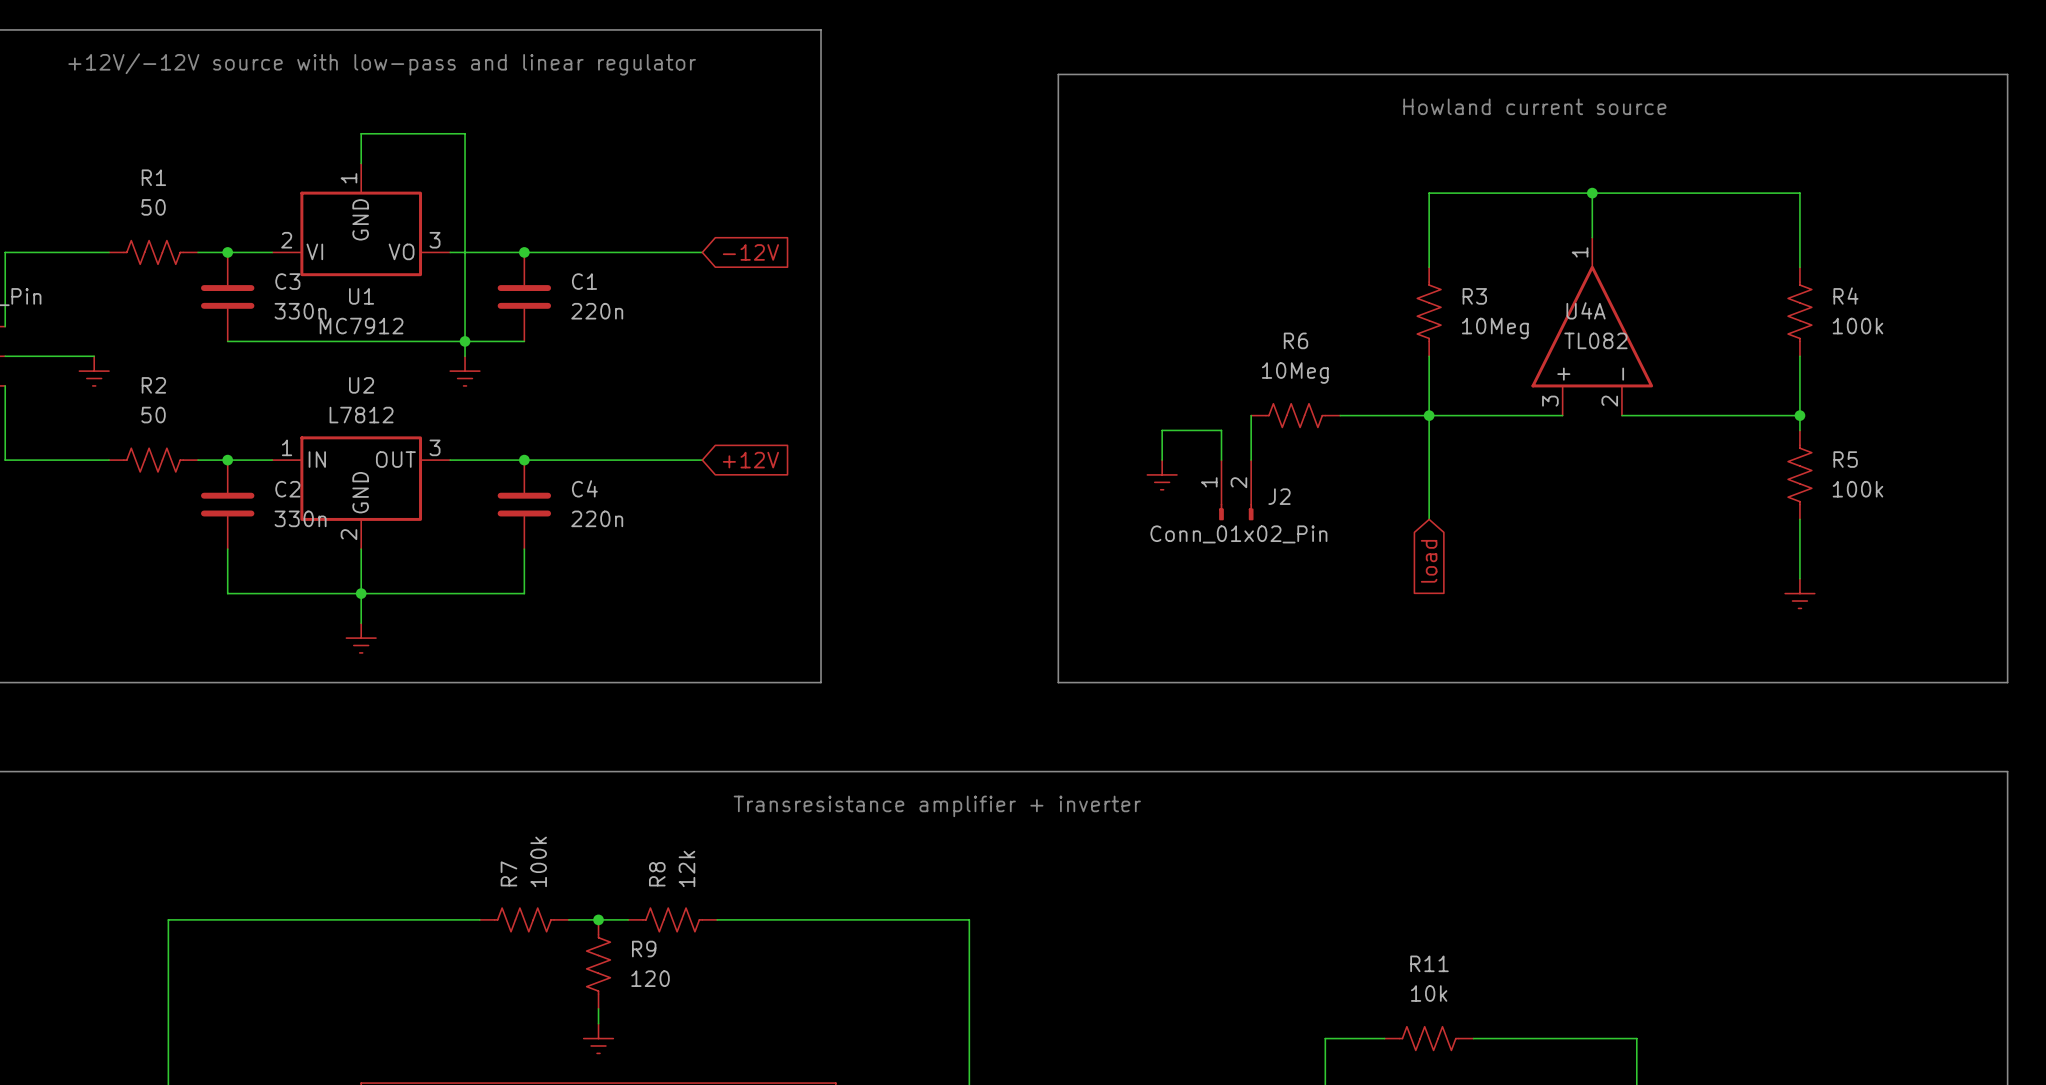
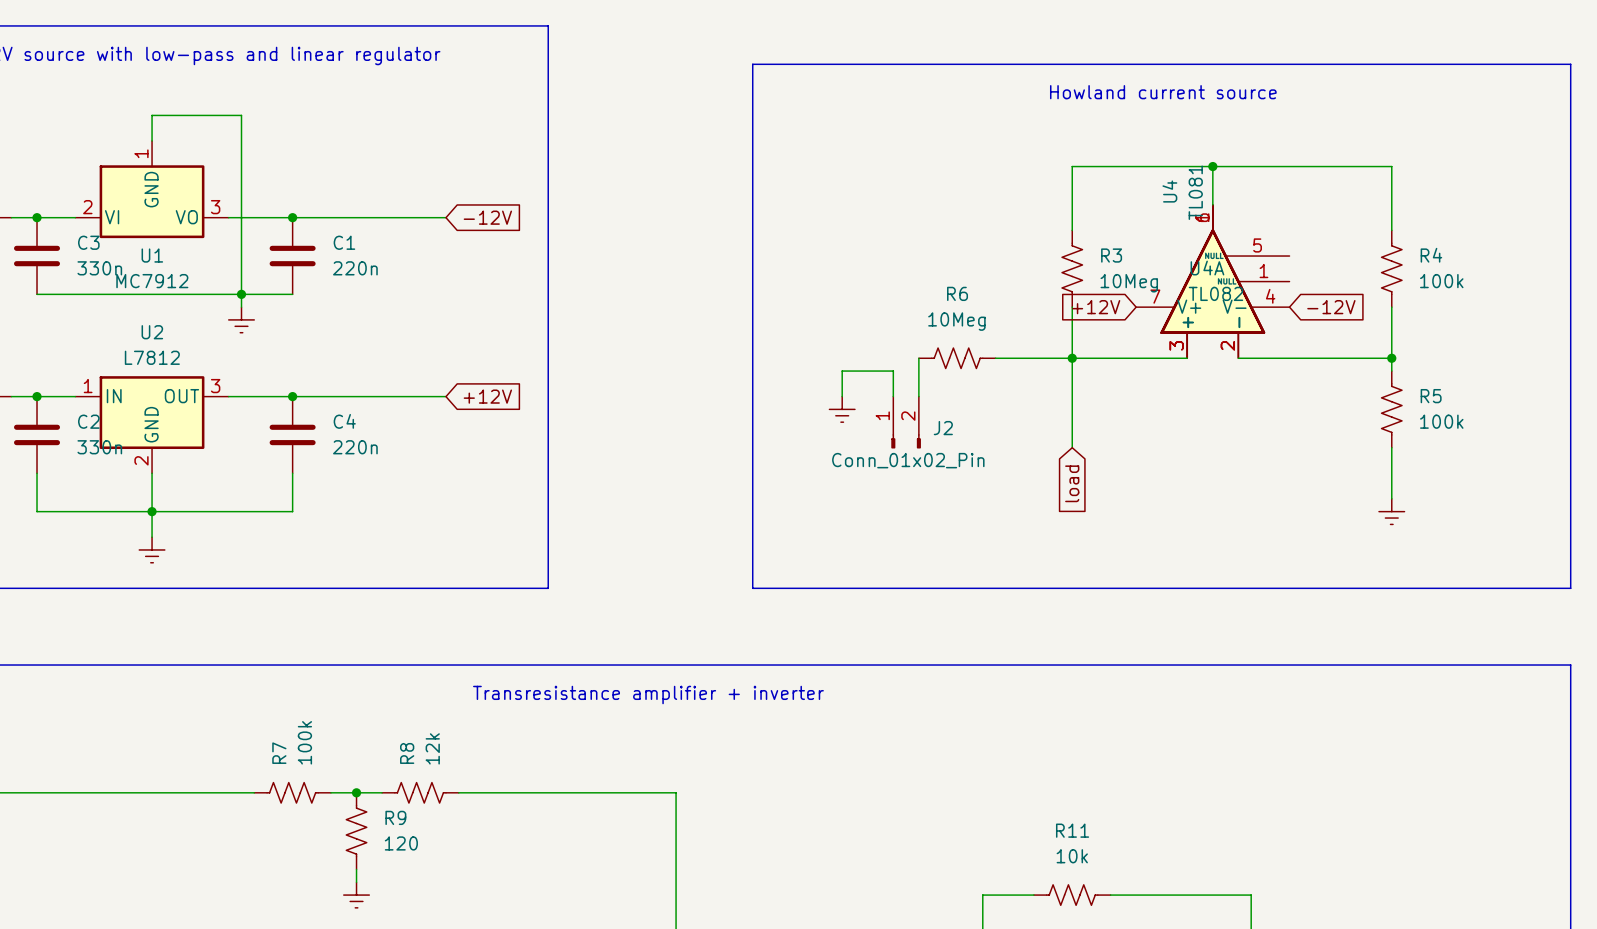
U4: none -> TL081 (1212, 281)
global label: none -> +12V (1096, 307)
global label: none -> -12V (1331, 307)

